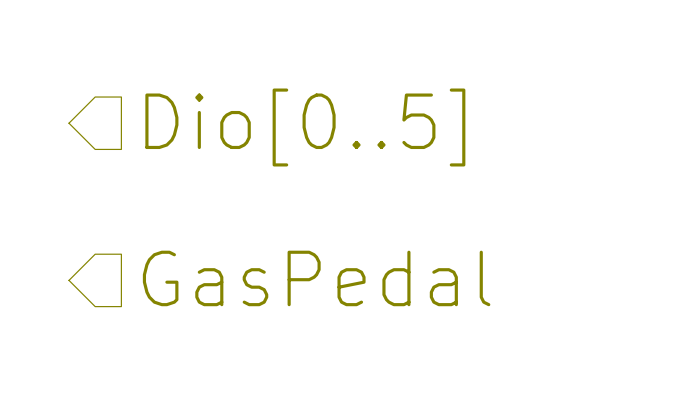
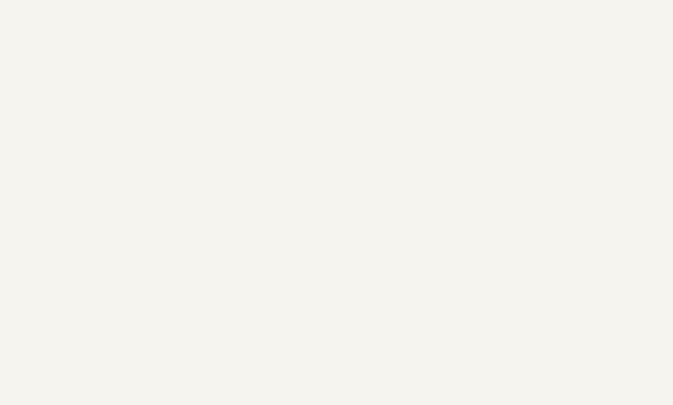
hierarchical label: Dio[0..5] (305, 127) -> none
hierarchical label: GasPedal (316, 278) -> none

